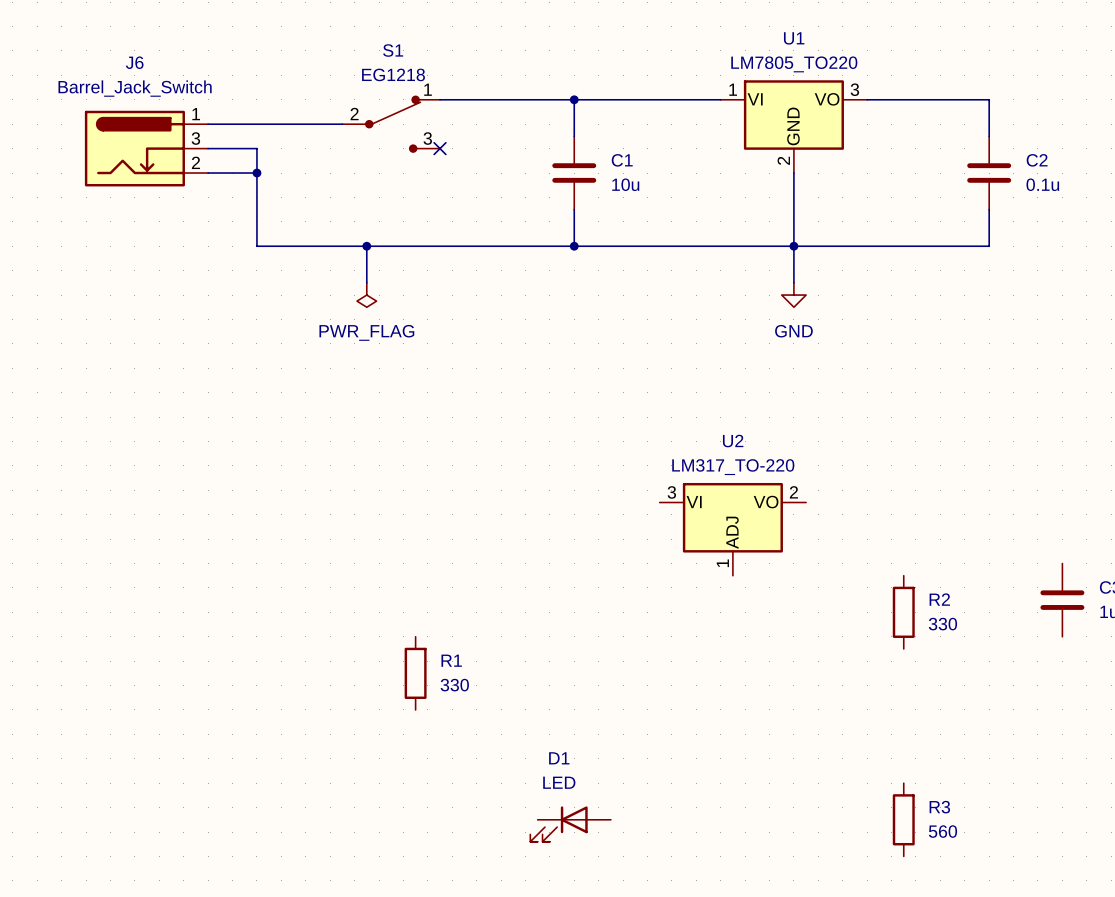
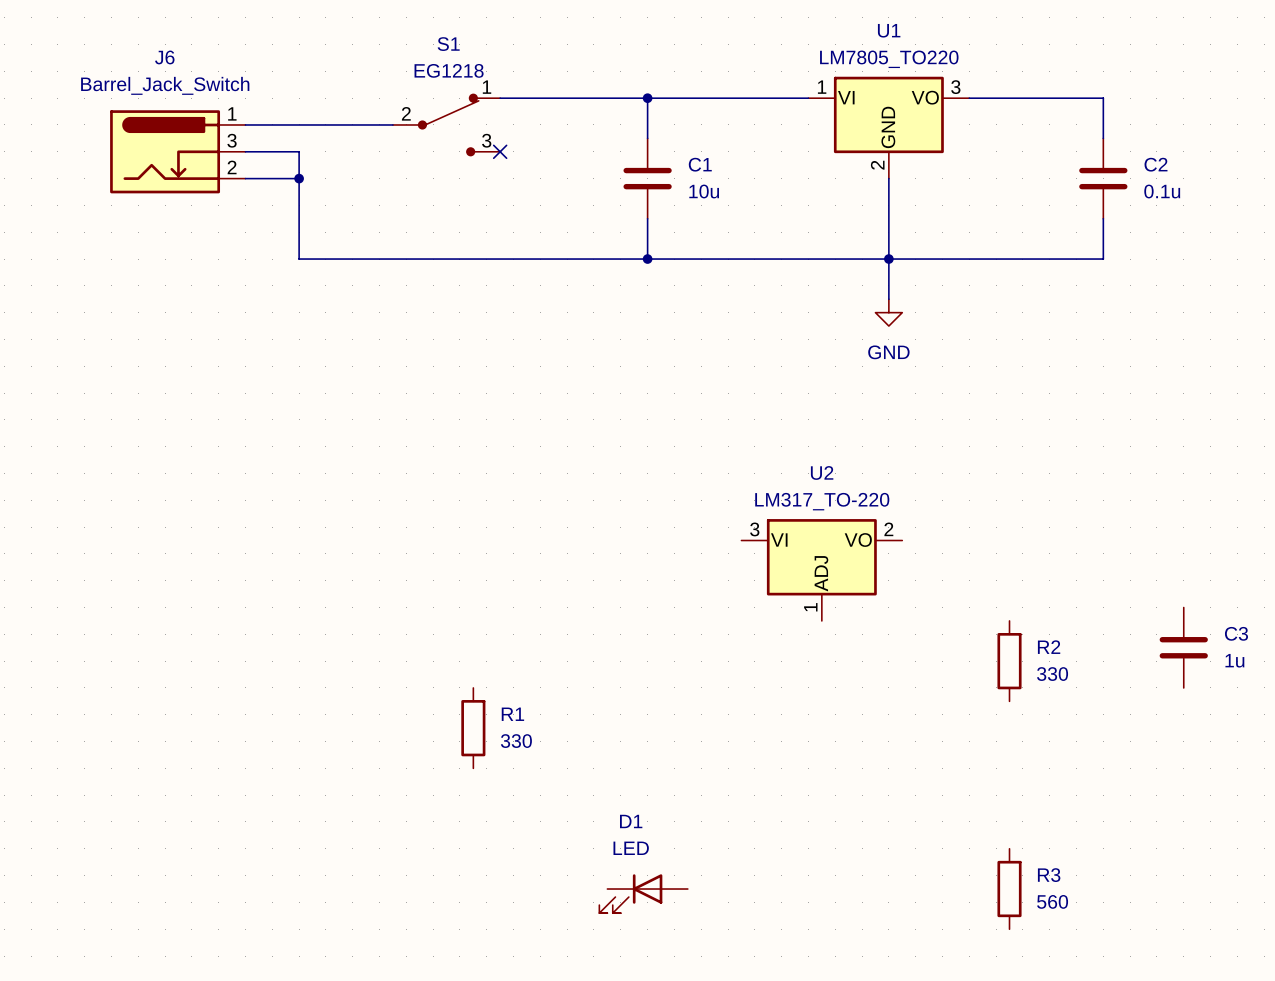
wire: (366, 246) (366, 282) -> none
junction: (366, 246) -> none
power symbol: PWR_FLAG (366, 295) -> none

